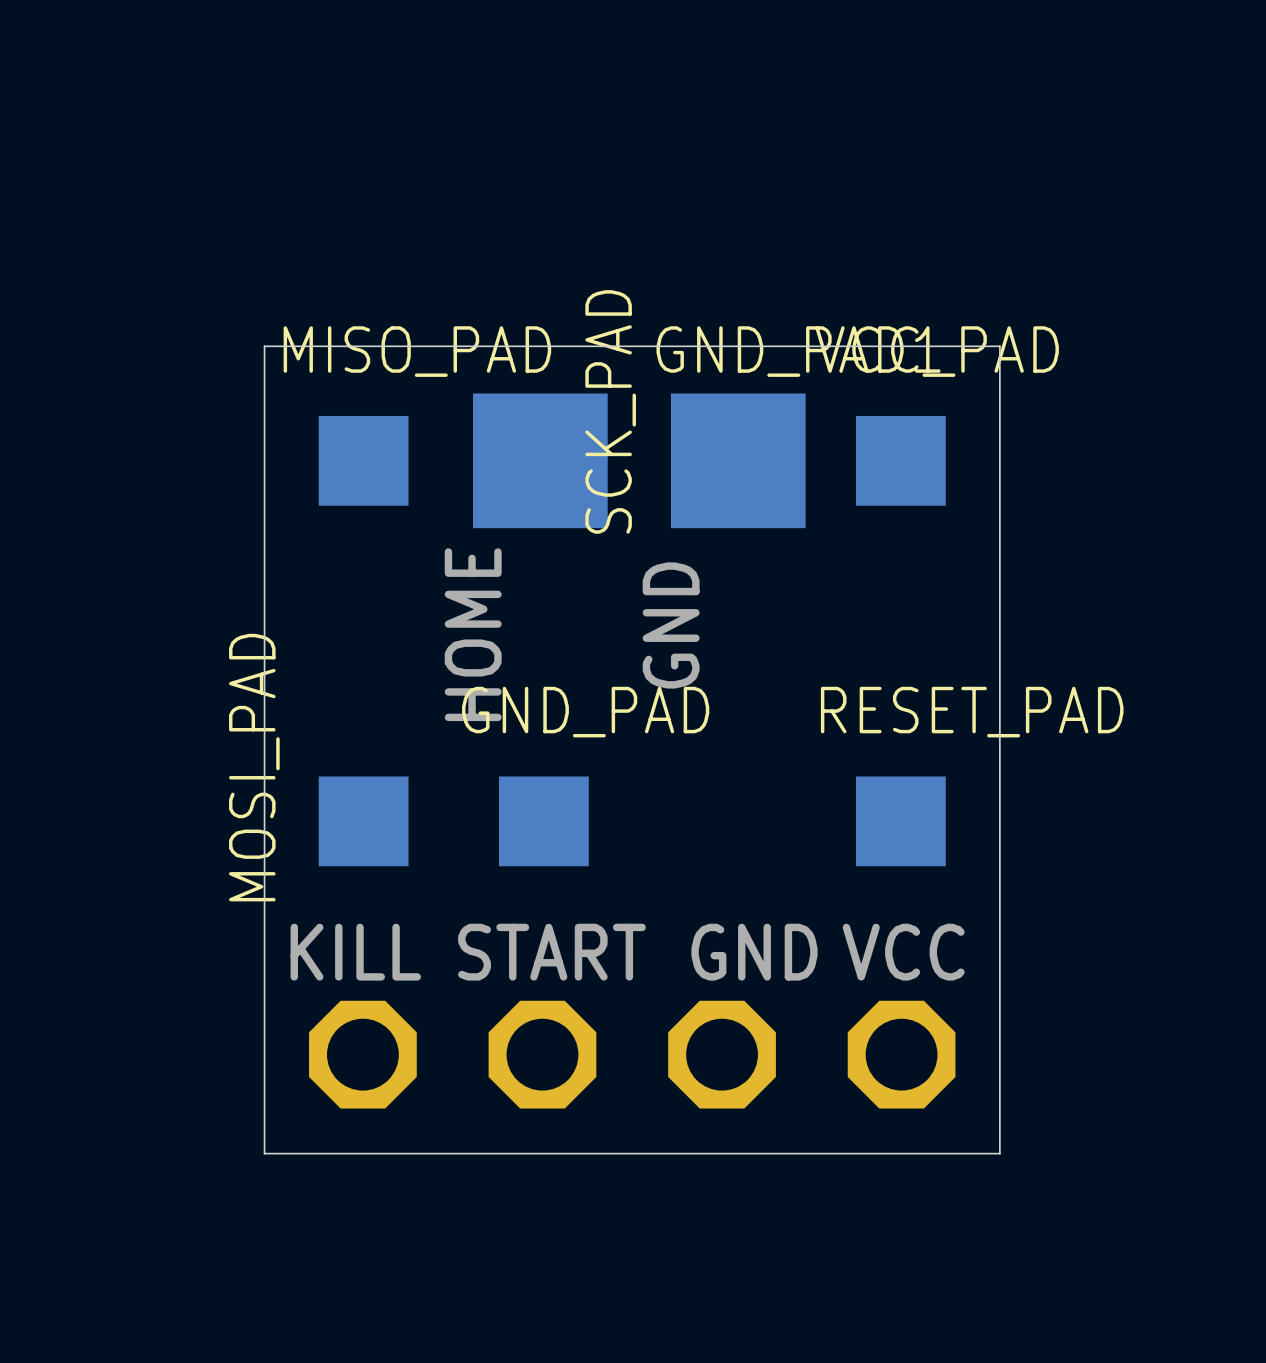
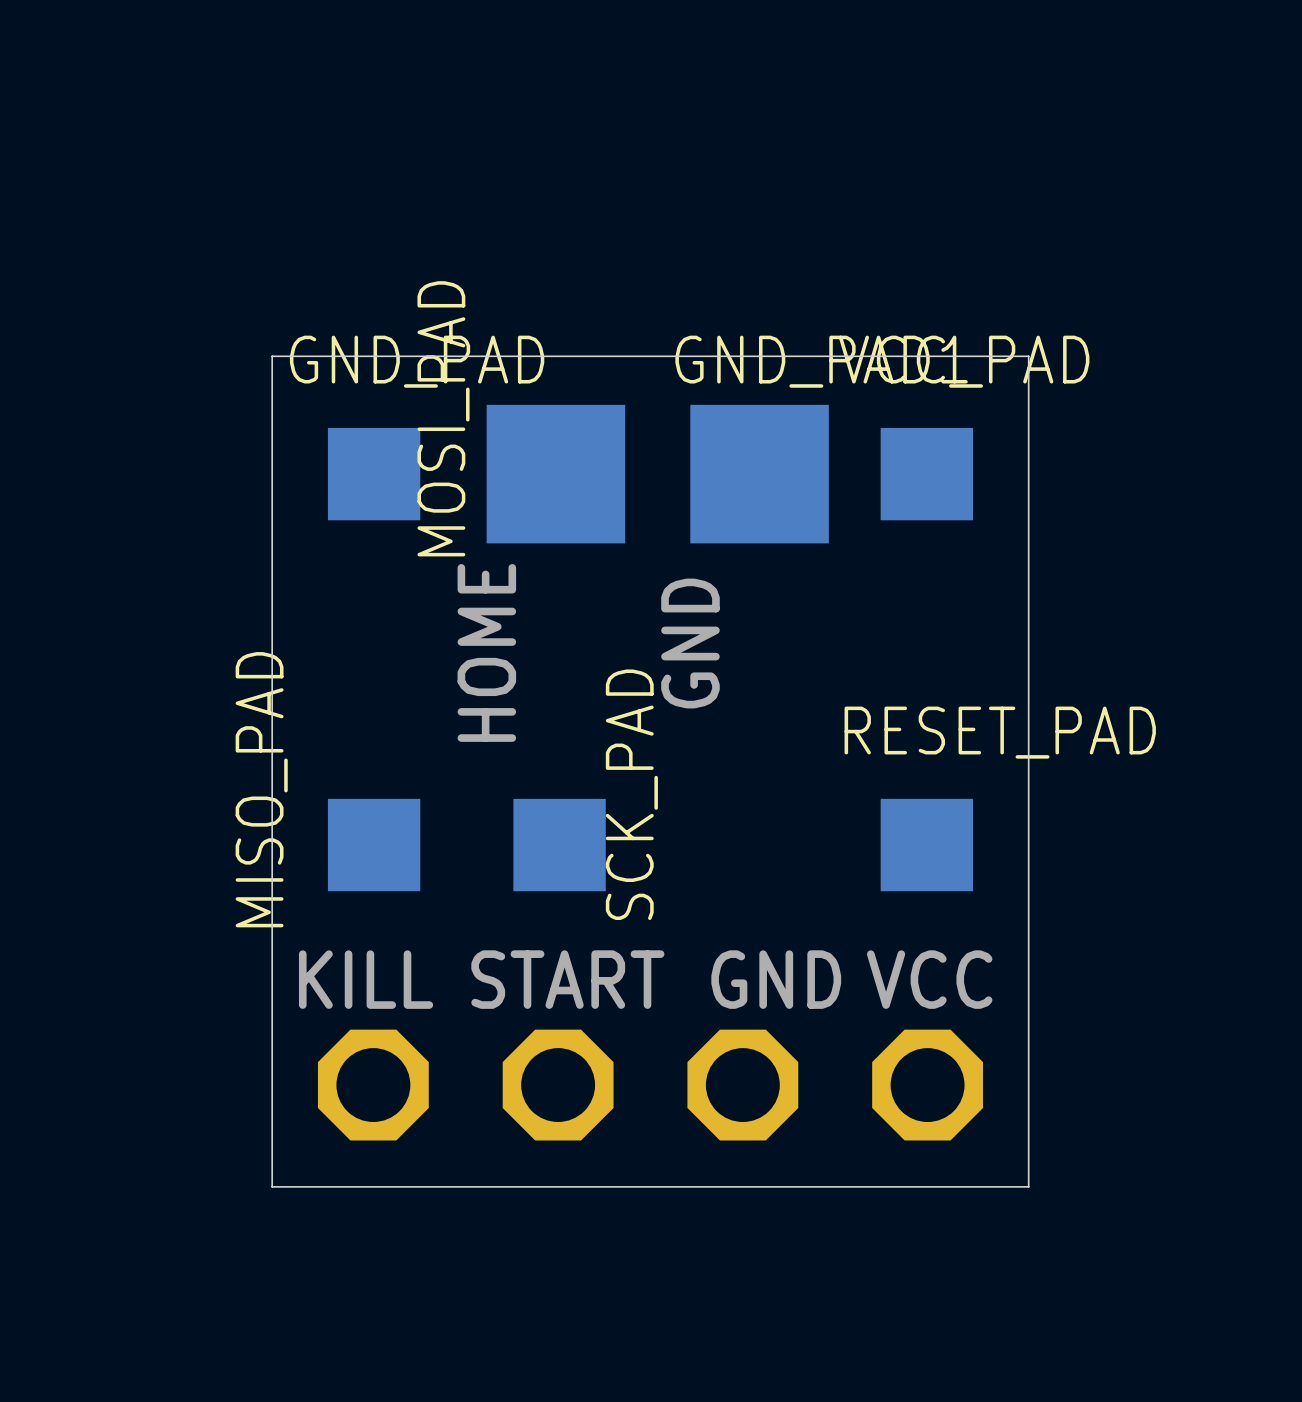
MISO_PAD name: MISO_PAD (417, 351) -> GND_PAD (417, 361)
SCK_PAD name: SCK_PAD (610, 411) -> MOSI_PAD (443, 418)
GND_PAD name: GND_PAD (585, 712) -> SCK_PAD (631, 794)
MOSI_PAD name: MOSI_PAD (254, 767) -> MISO_PAD (261, 789)

